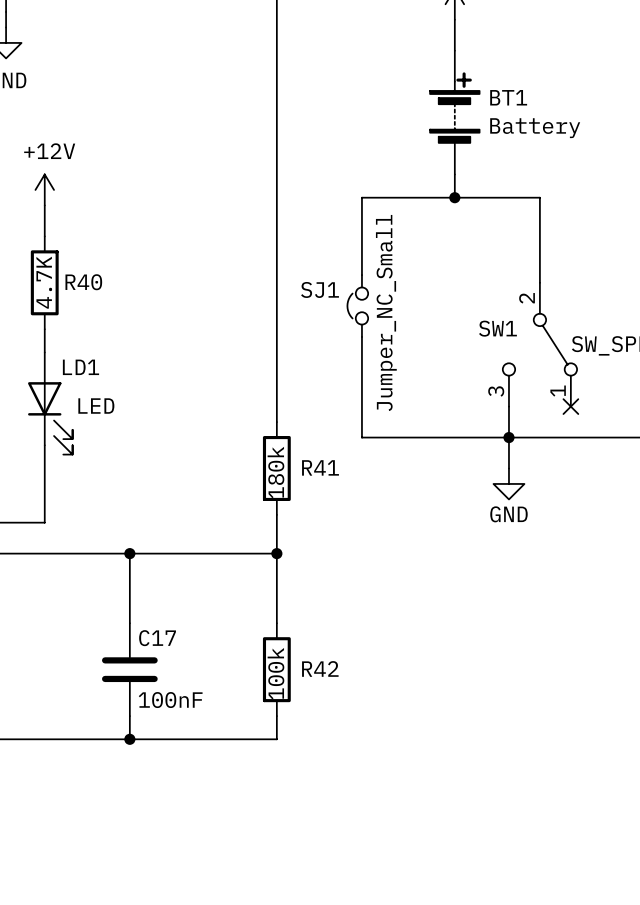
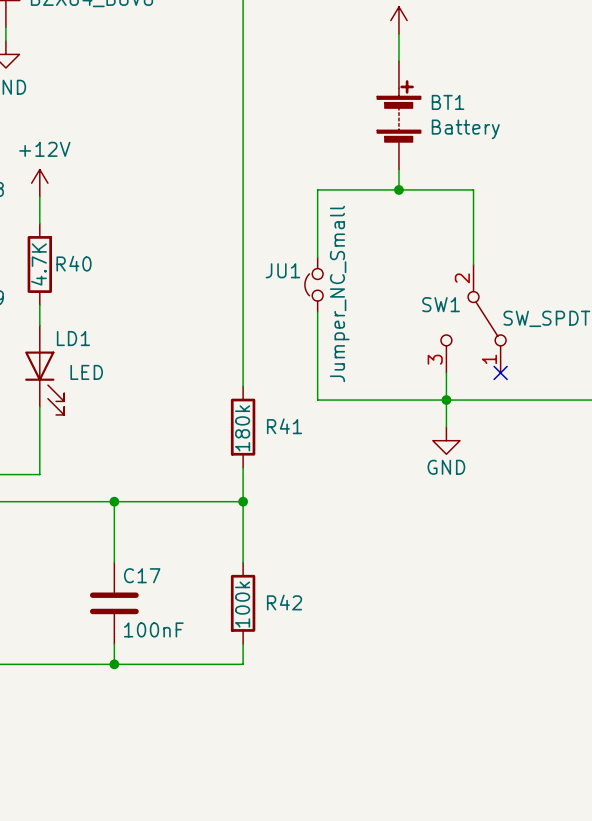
SJ1 name: SJ1 (320, 289) -> JU1 (282, 270)

